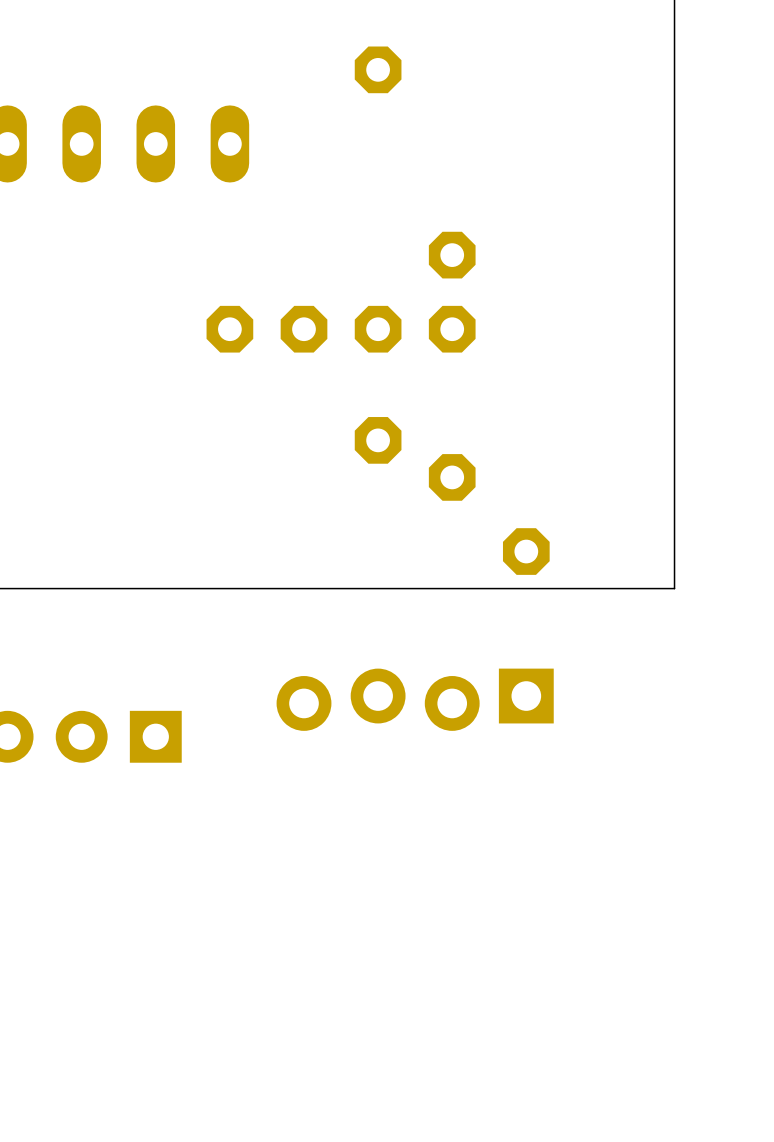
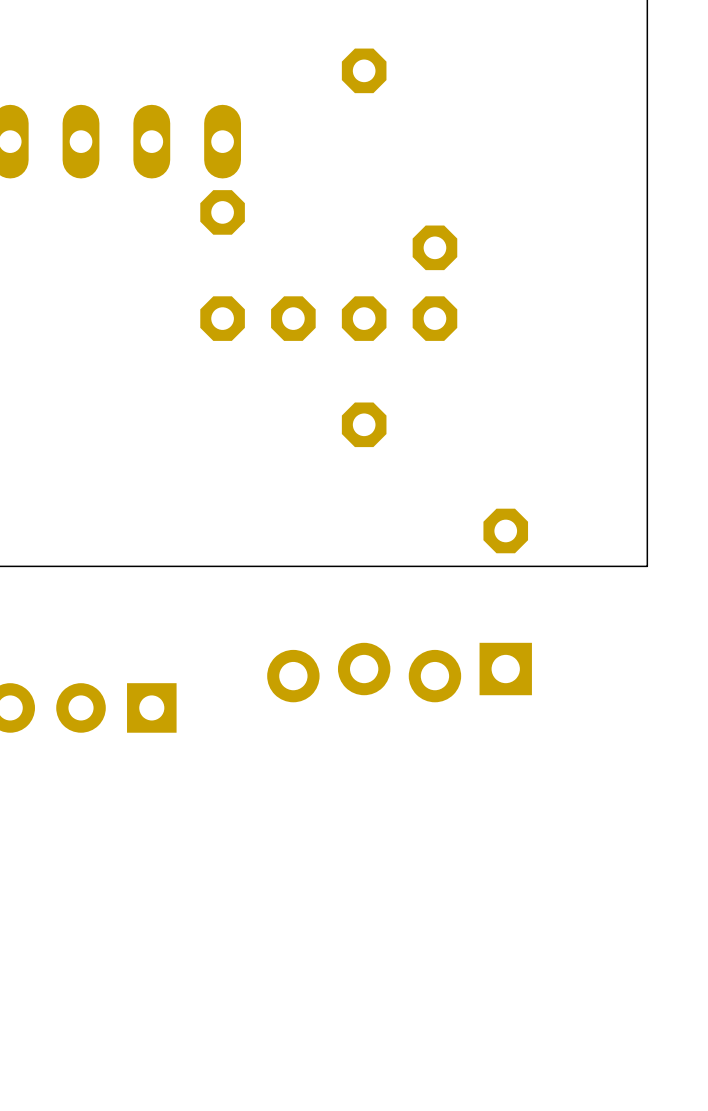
part position: (452, 477) -> (222, 212)

